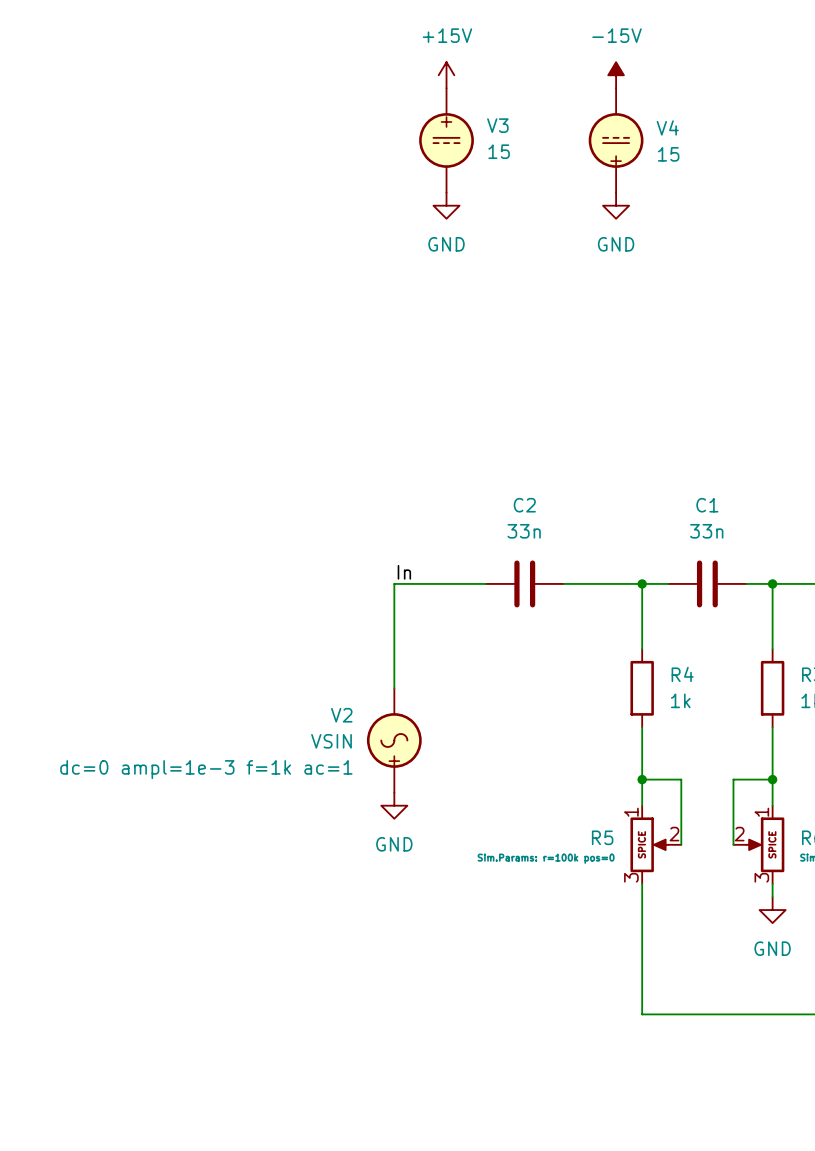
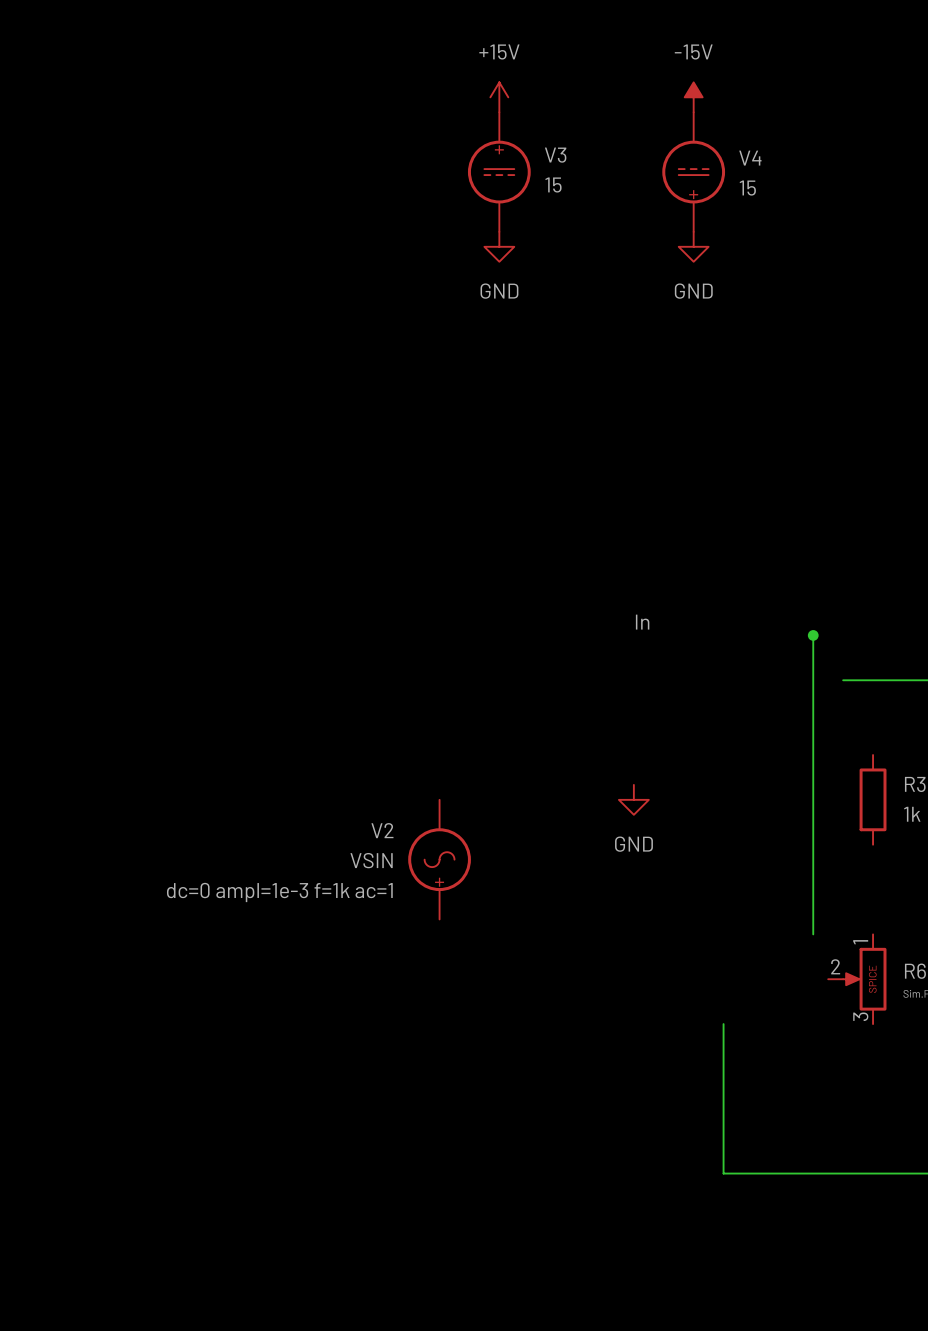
wire: none -> (813, 635) (813, 934)
junction: none -> (813, 635)
label position: In (404, 572) -> In (642, 622)
wire: (485, 583) (394, 583) (394, 688) -> none
C2: 33n (524, 583) -> none
wire: (563, 583) (668, 583) -> none
wire: (642, 583) (642, 649) -> none
junction: (642, 583) -> none
C1: 33n (707, 583) -> none
wire: (772, 583) (772, 649) -> none
junction: (772, 583) -> none
power symbol: none -> GND (633, 799)
R4: 1k (642, 688) -> none
wire: (642, 727) (642, 805) -> none
wire: (772, 727) (772, 805) -> none
wire: (642, 779) (681, 779) (681, 844) -> none
junction: (642, 779) -> none
wire: (772, 779) (733, 779) (733, 844) -> none
junction: (772, 779) -> none
power symbol: GND (394, 805) -> none
R5: (655, 844) -> none
wire: (772, 883) (772, 897) -> none
power symbol: GND (772, 910) -> none

